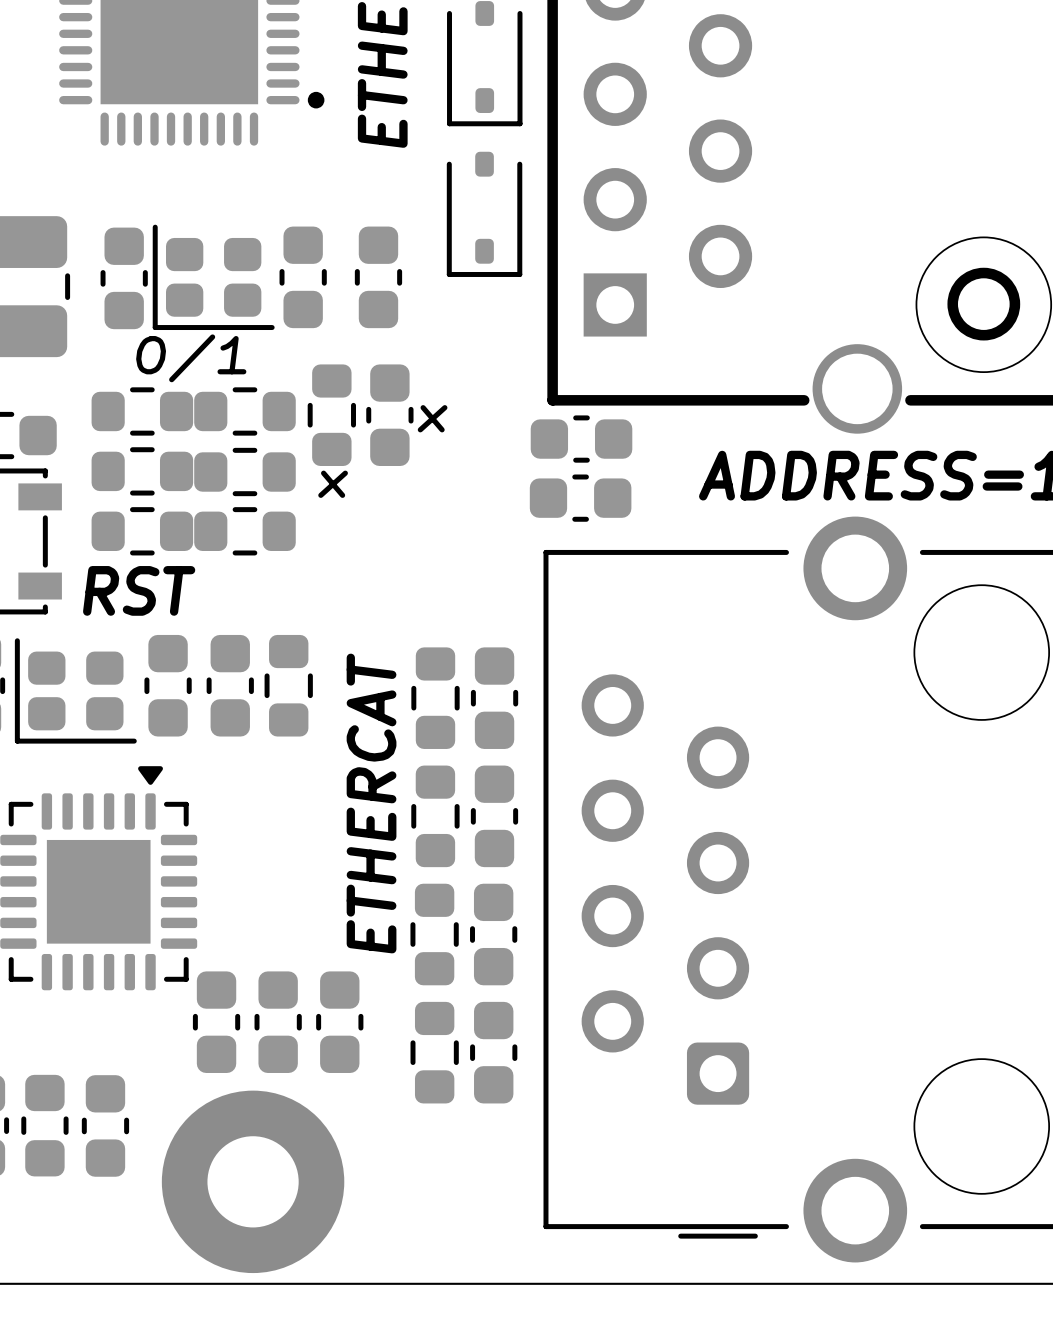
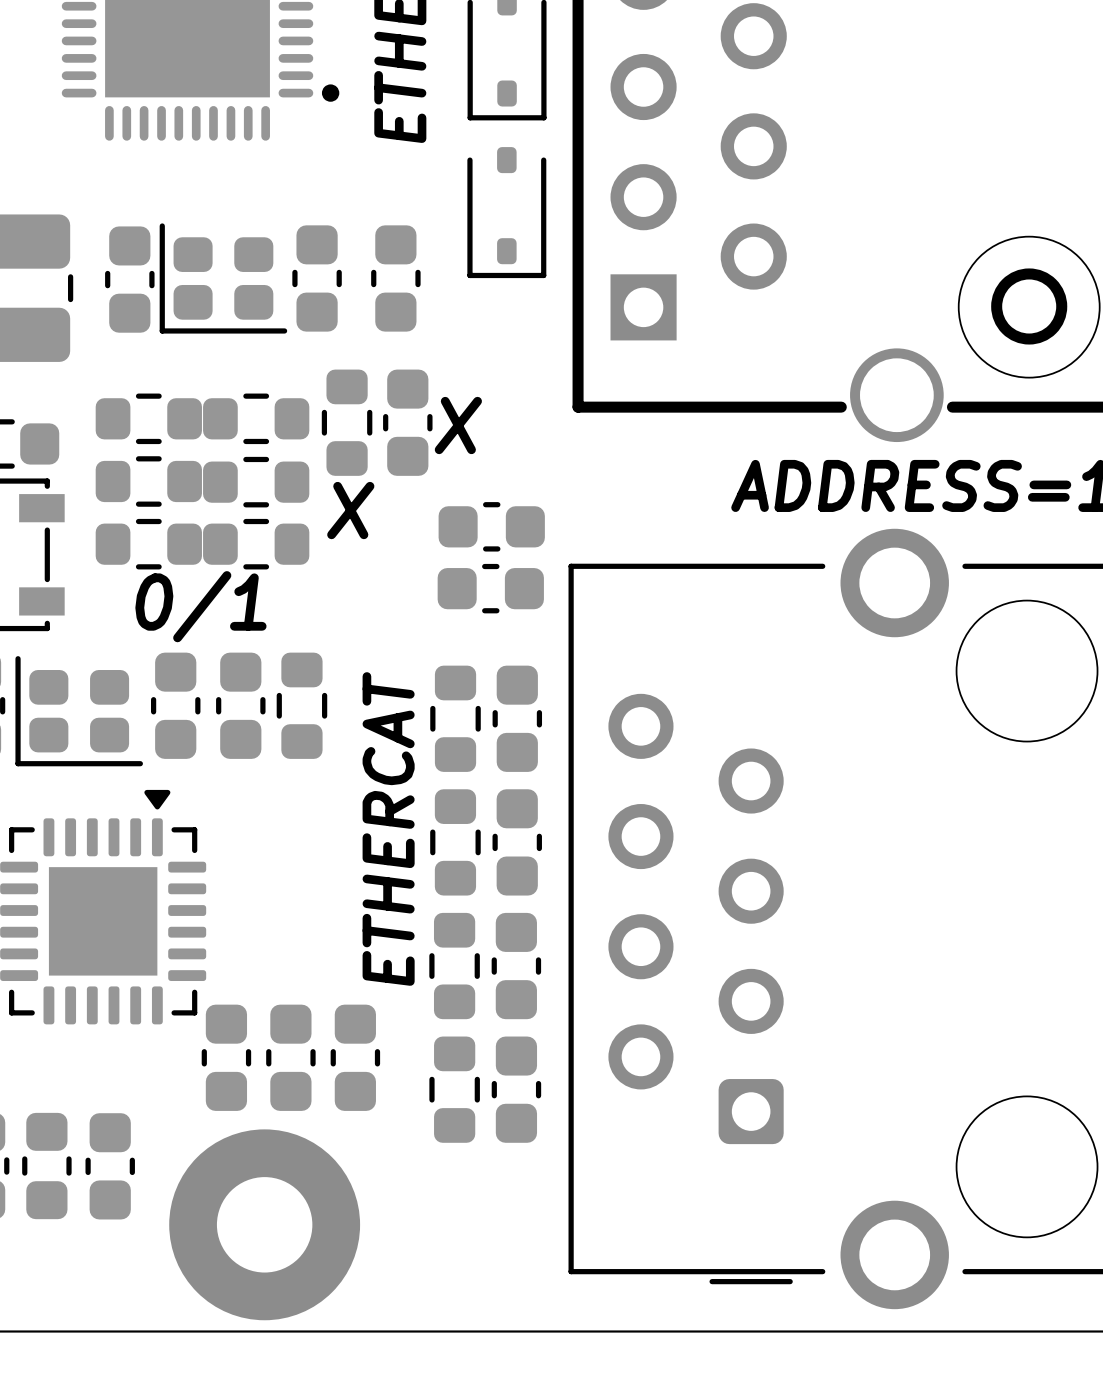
text: 0/1 (191, 358) -> none
text: x (432, 418) -> X (458, 425)
part: (581, 439) -> none
text: x (333, 484) -> X (350, 510)
part: (580, 498) -> none
part: none -> (491, 526)
part: none -> (490, 588)
text: RST (139, 590) -> 0/1 (200, 606)

